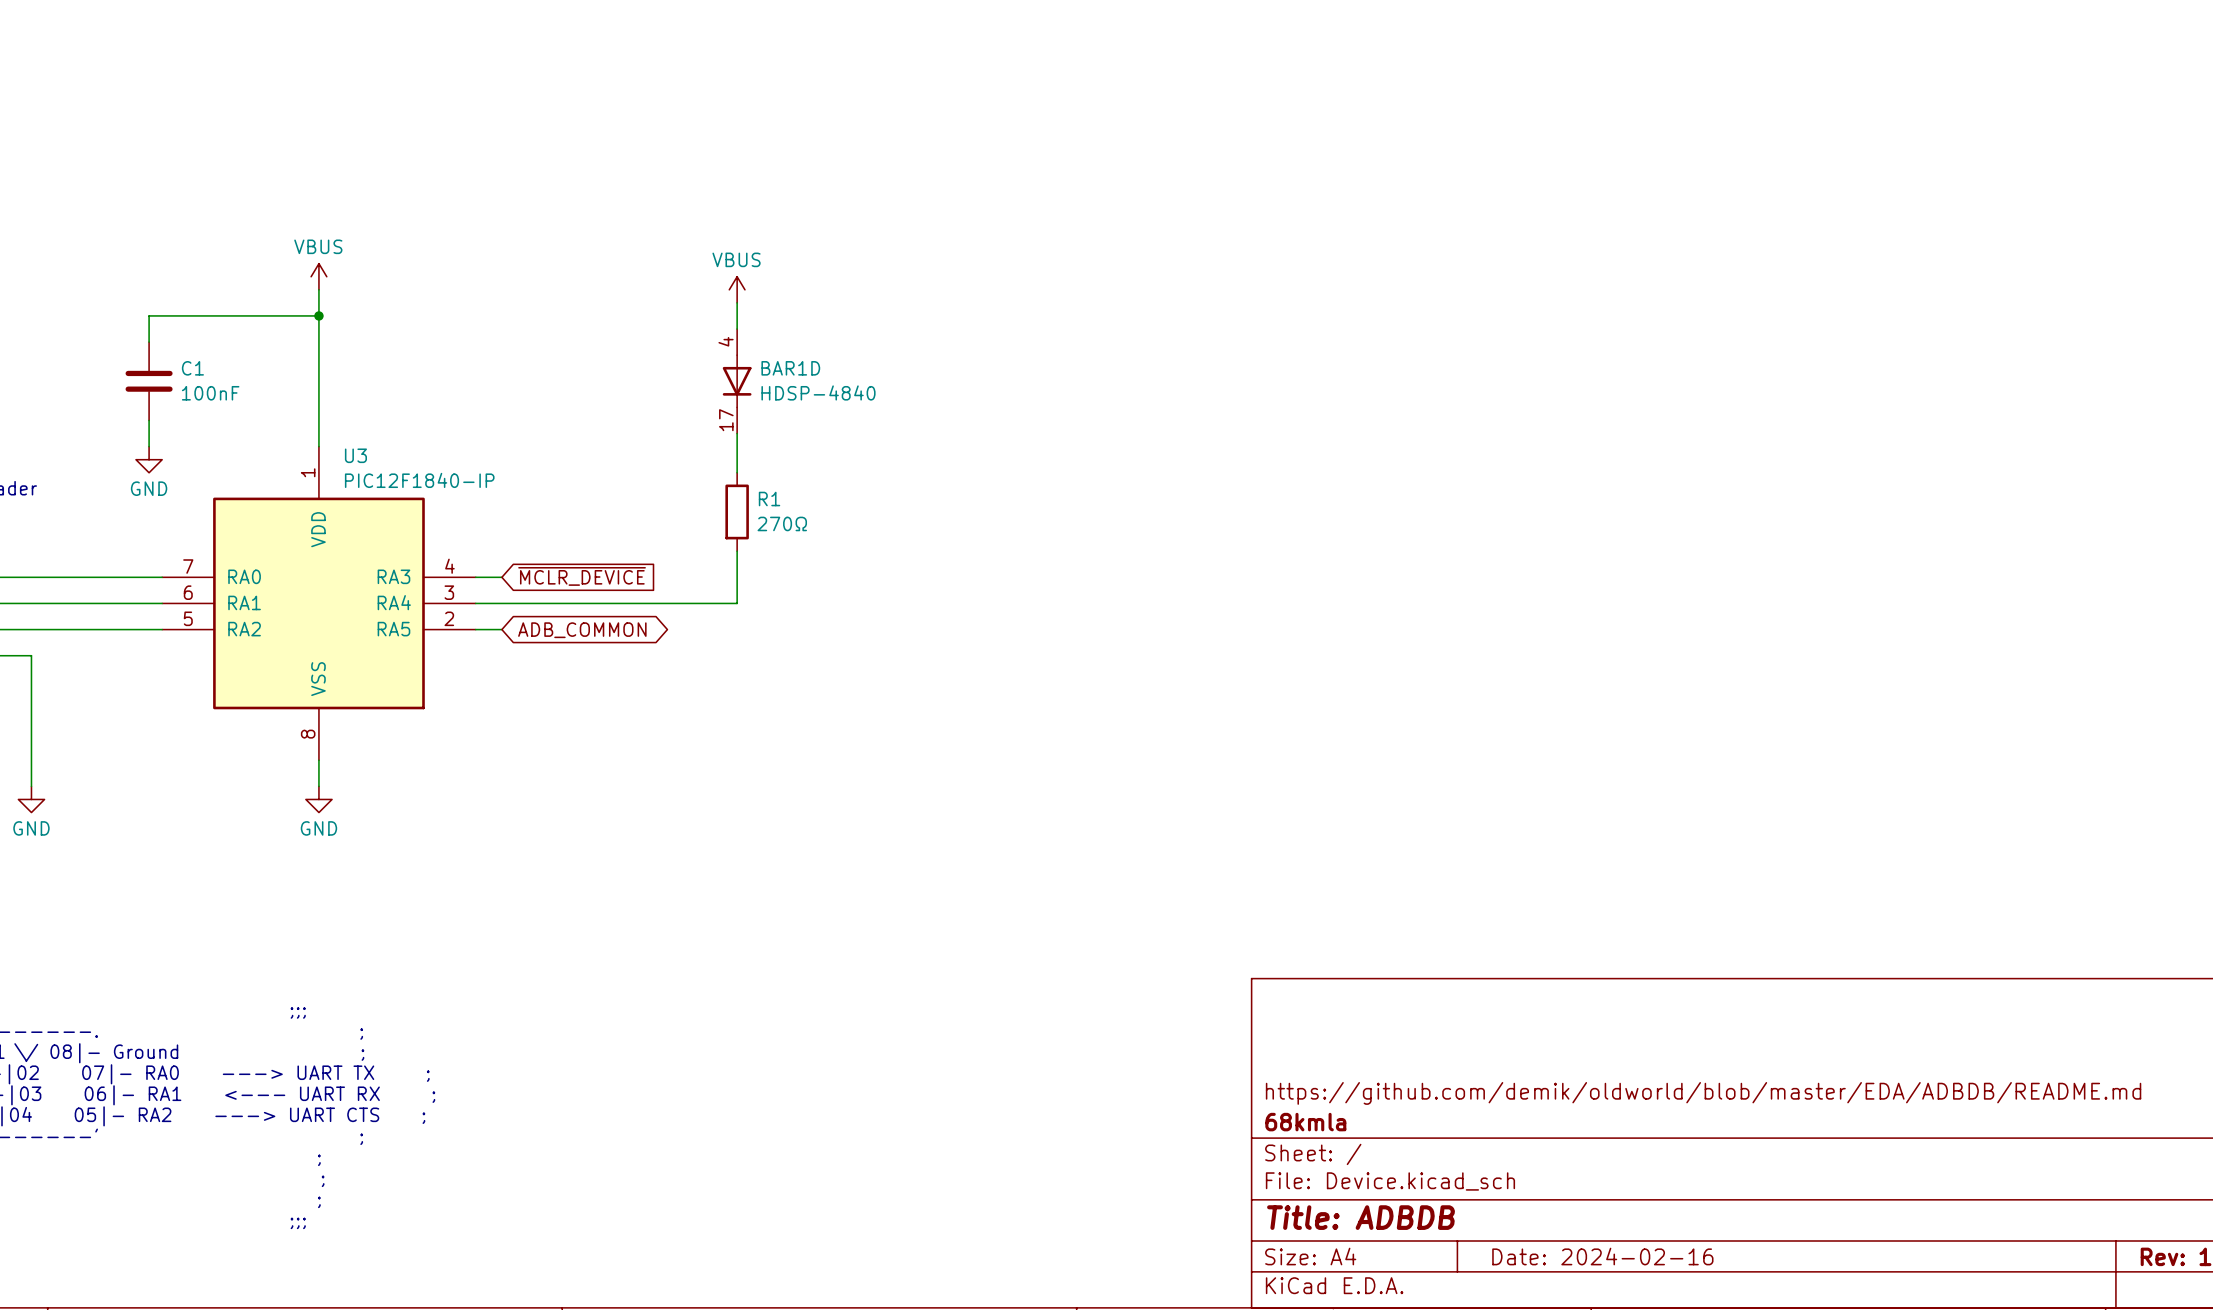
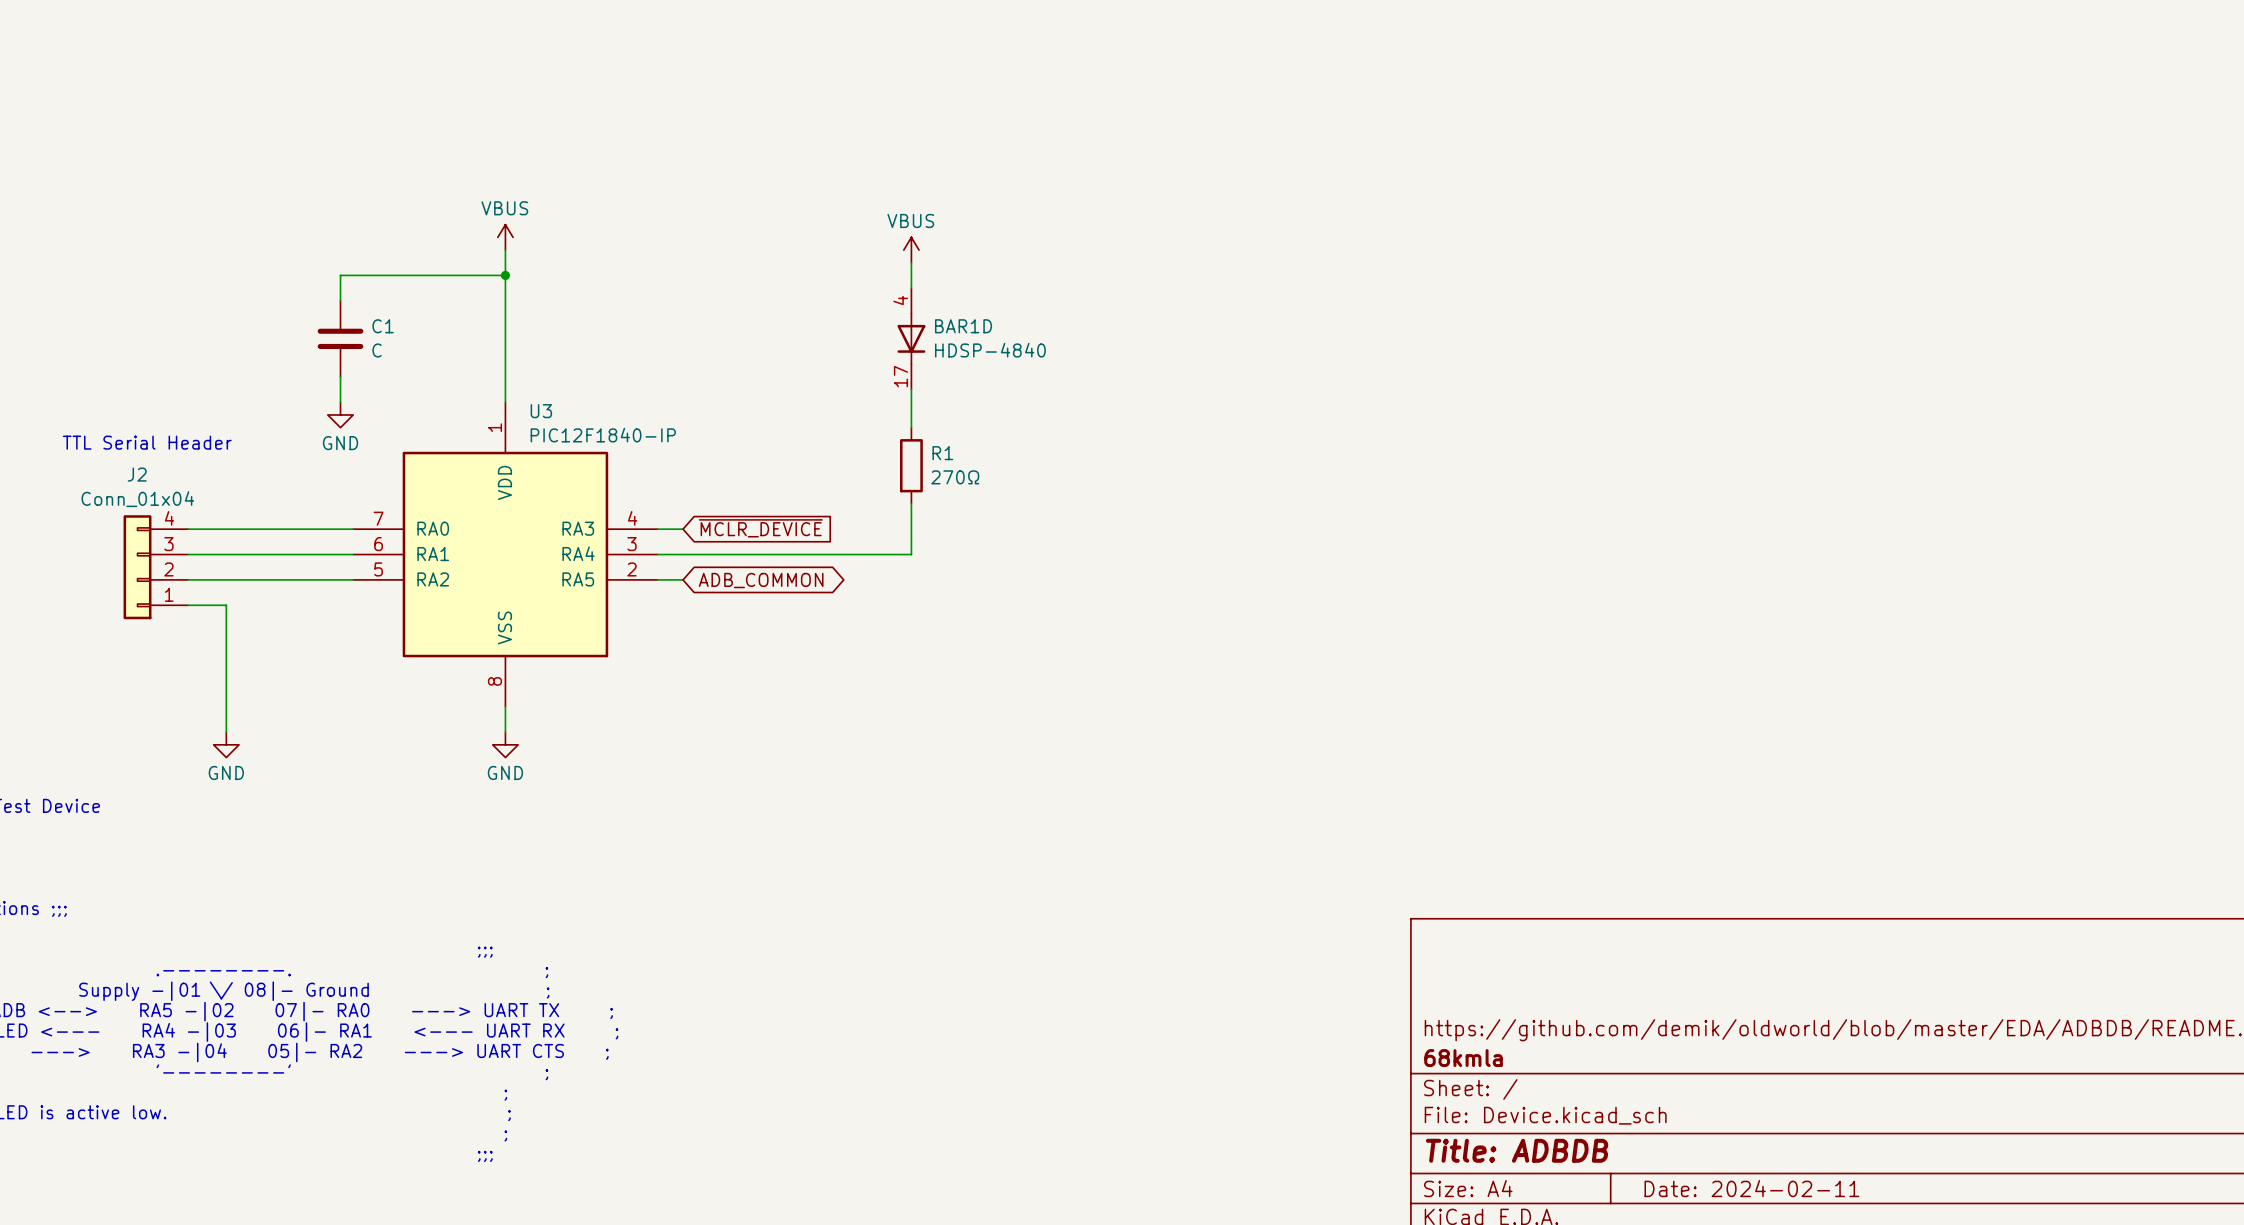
C1 value: 100nF (210, 393) -> C (377, 350)
title block: Date: 2024-02-16 (1602, 1256) -> Date: 2024-02-11 (1751, 1188)

